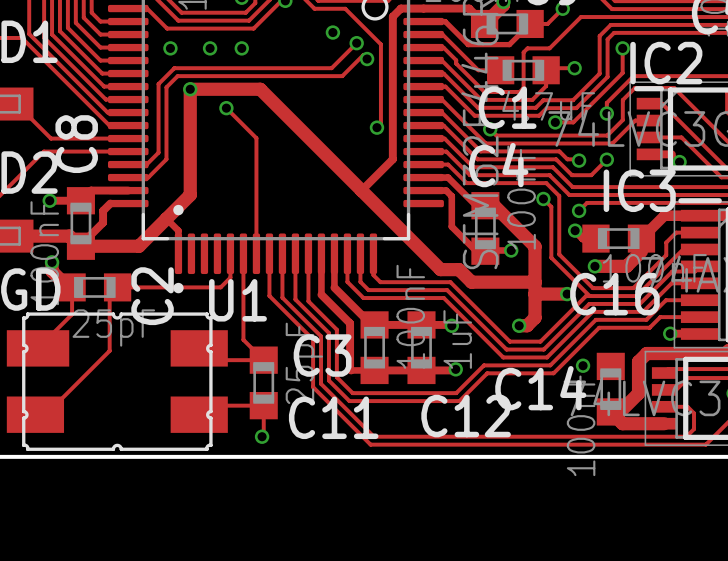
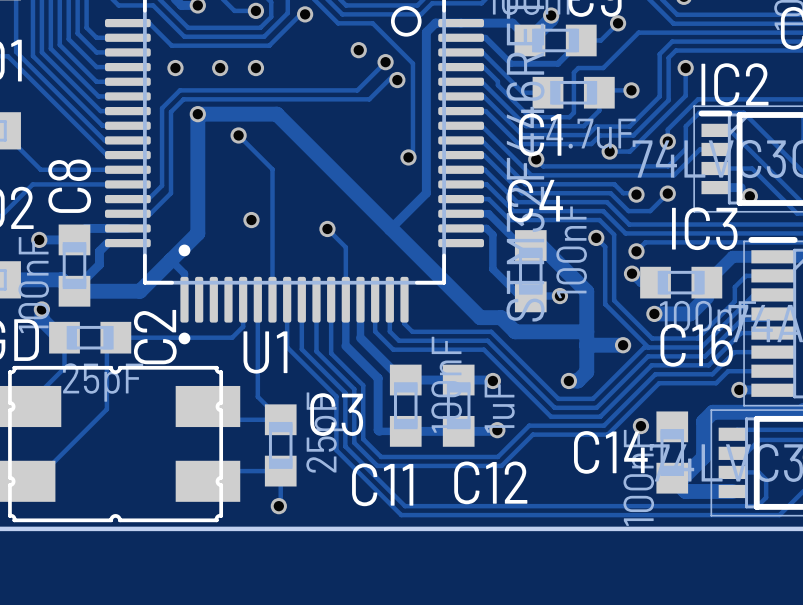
via: none -> (251, 220)
track: none -> (327, 228) (345, 247) (345, 299)
via: none -> (327, 228)

